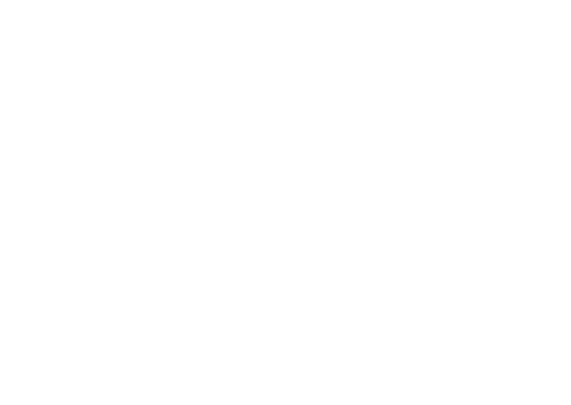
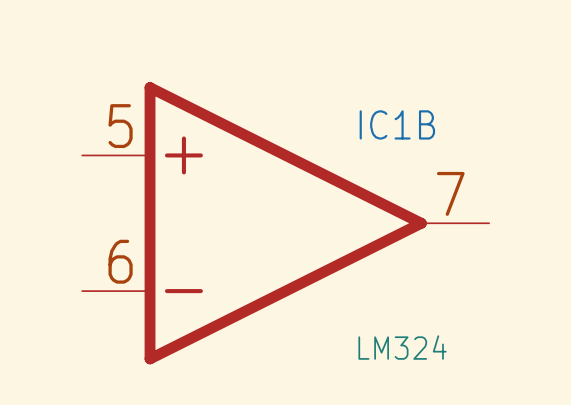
IC1B: none -> LM324 (285, 223)

